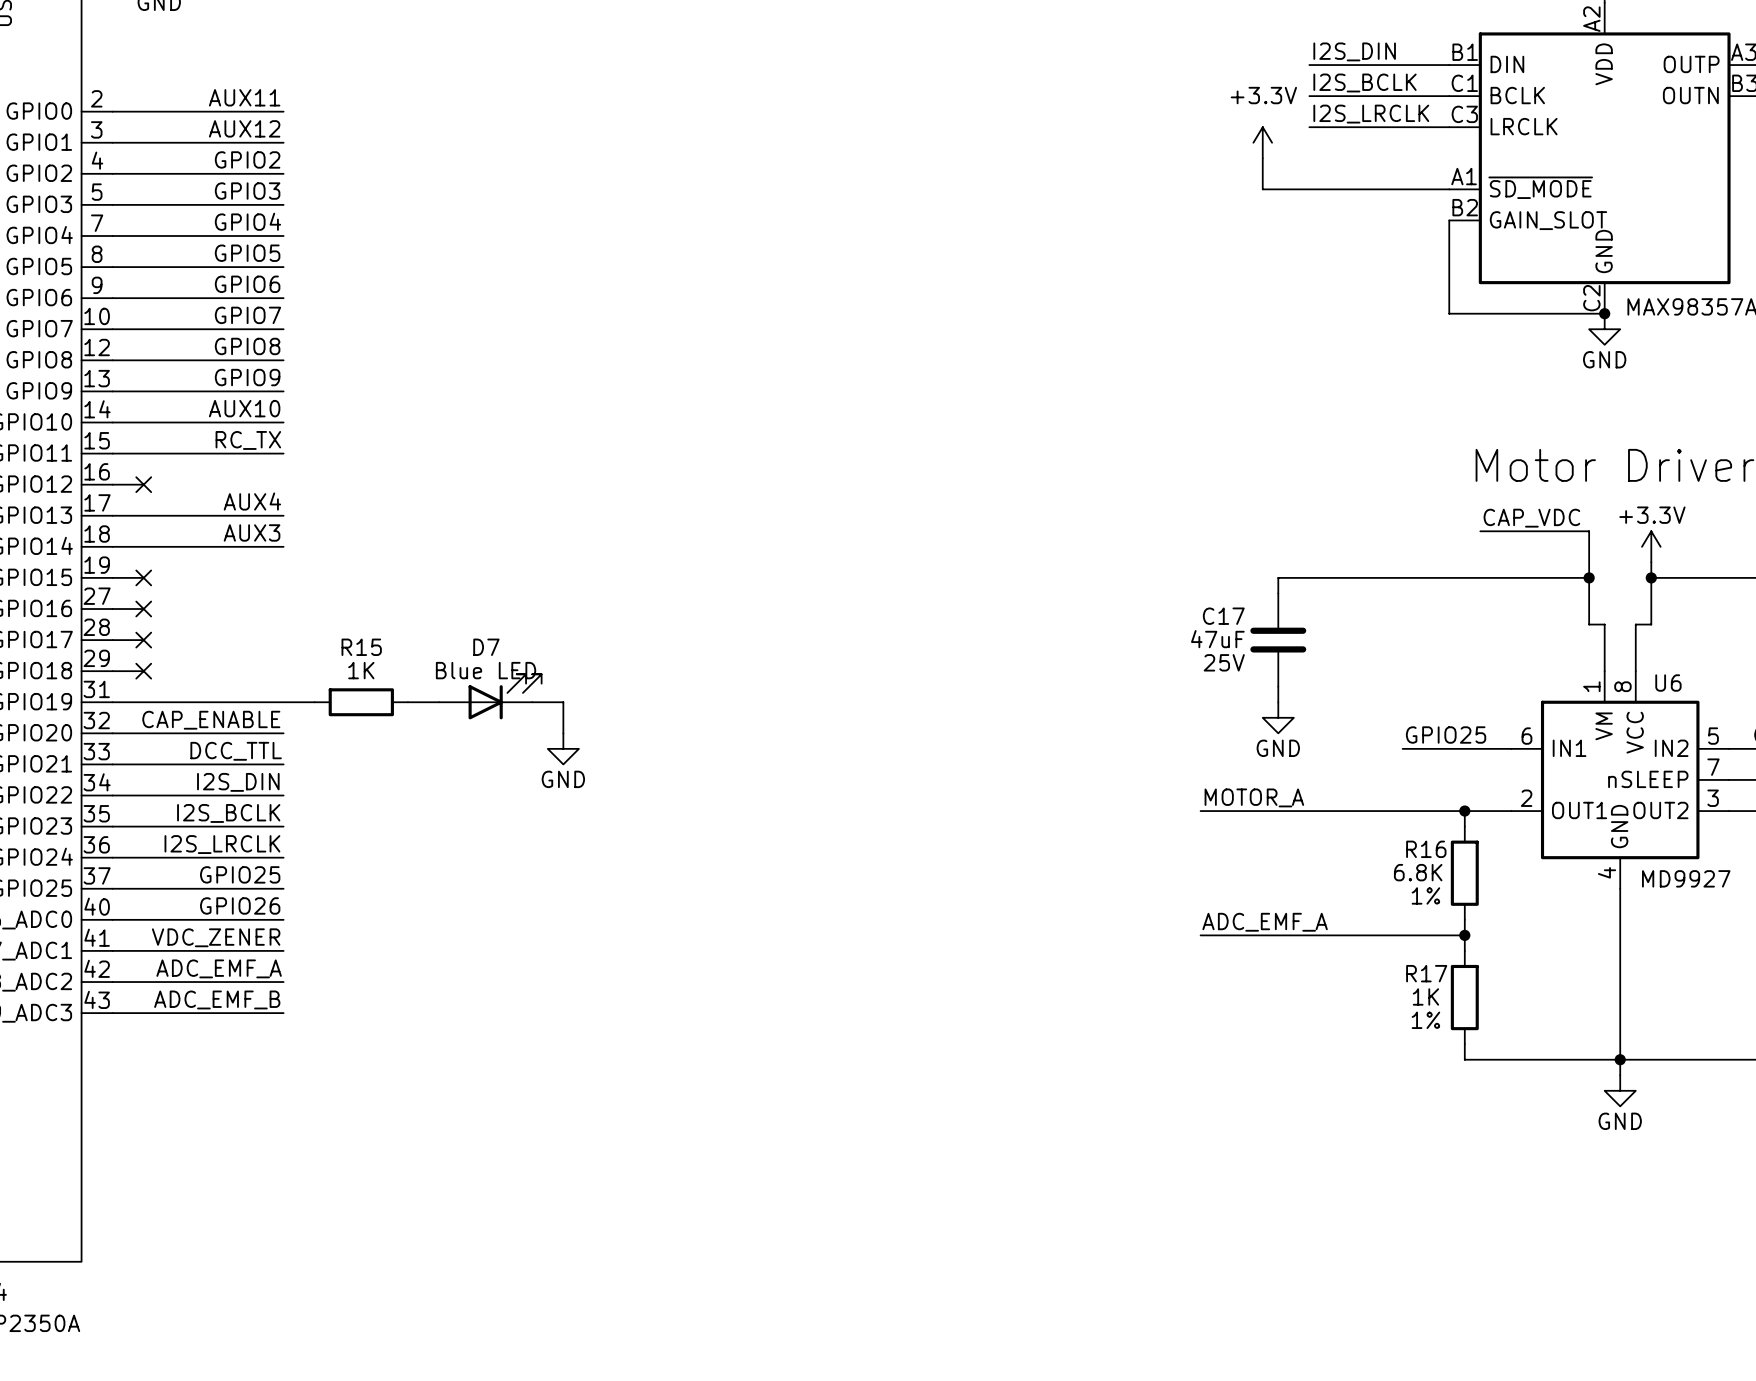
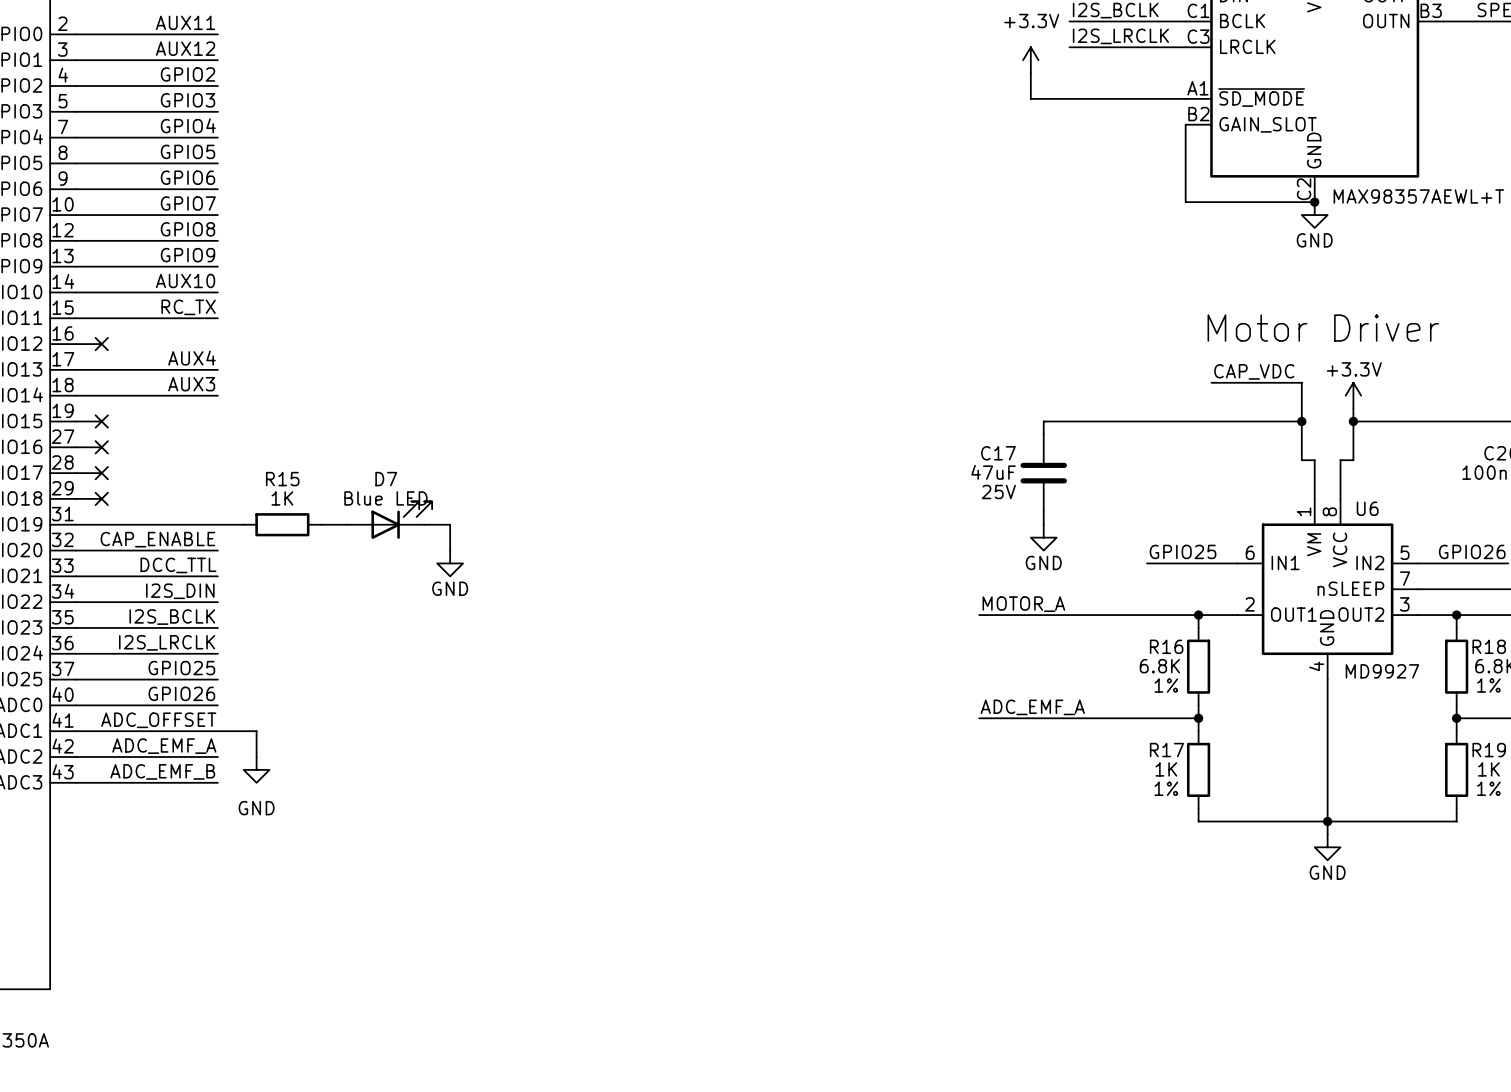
label: VDC_ZENER (216, 937) -> ADC_OFFSET (158, 720)
wire: none -> (217, 731) (256, 731) (256, 757)
power symbol: none -> GND (256, 769)

